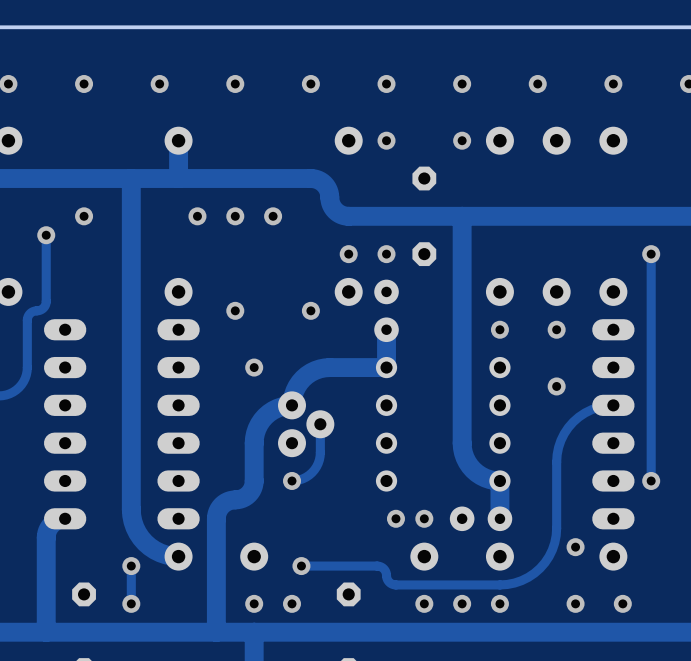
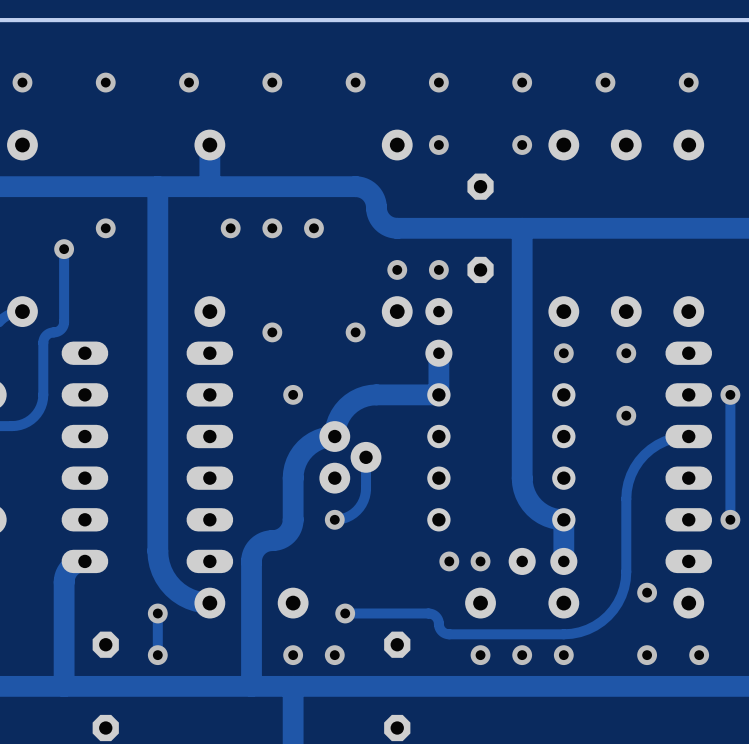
track: (651, 254) (651, 367) -> none
via: (651, 254) -> none
via: none -> (730, 394)

